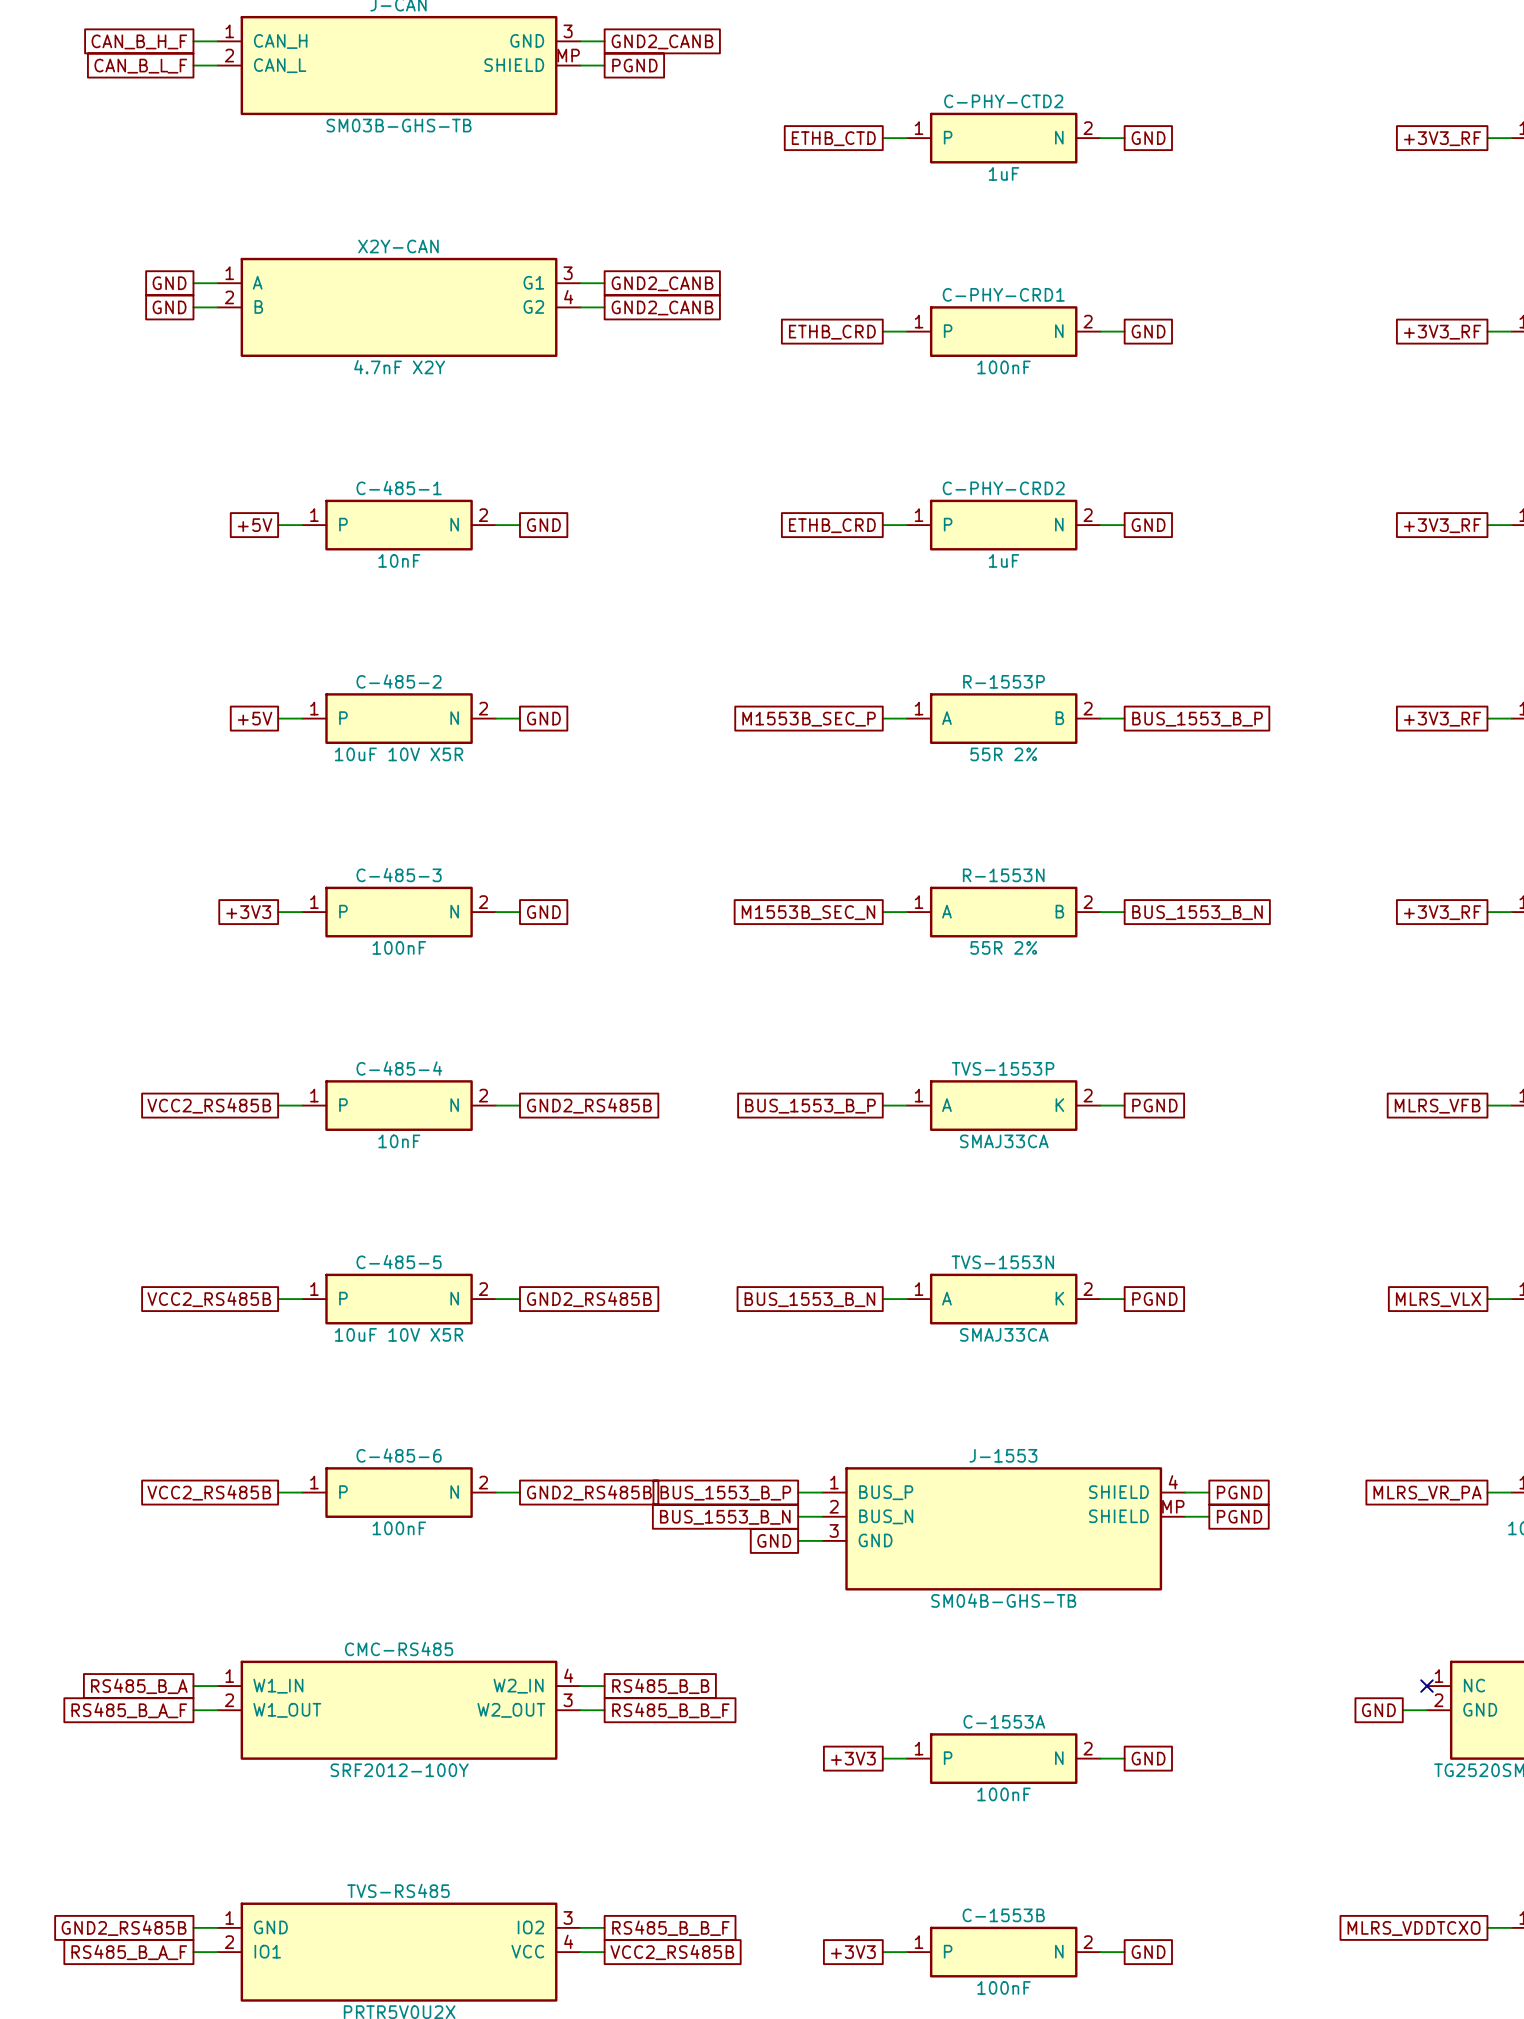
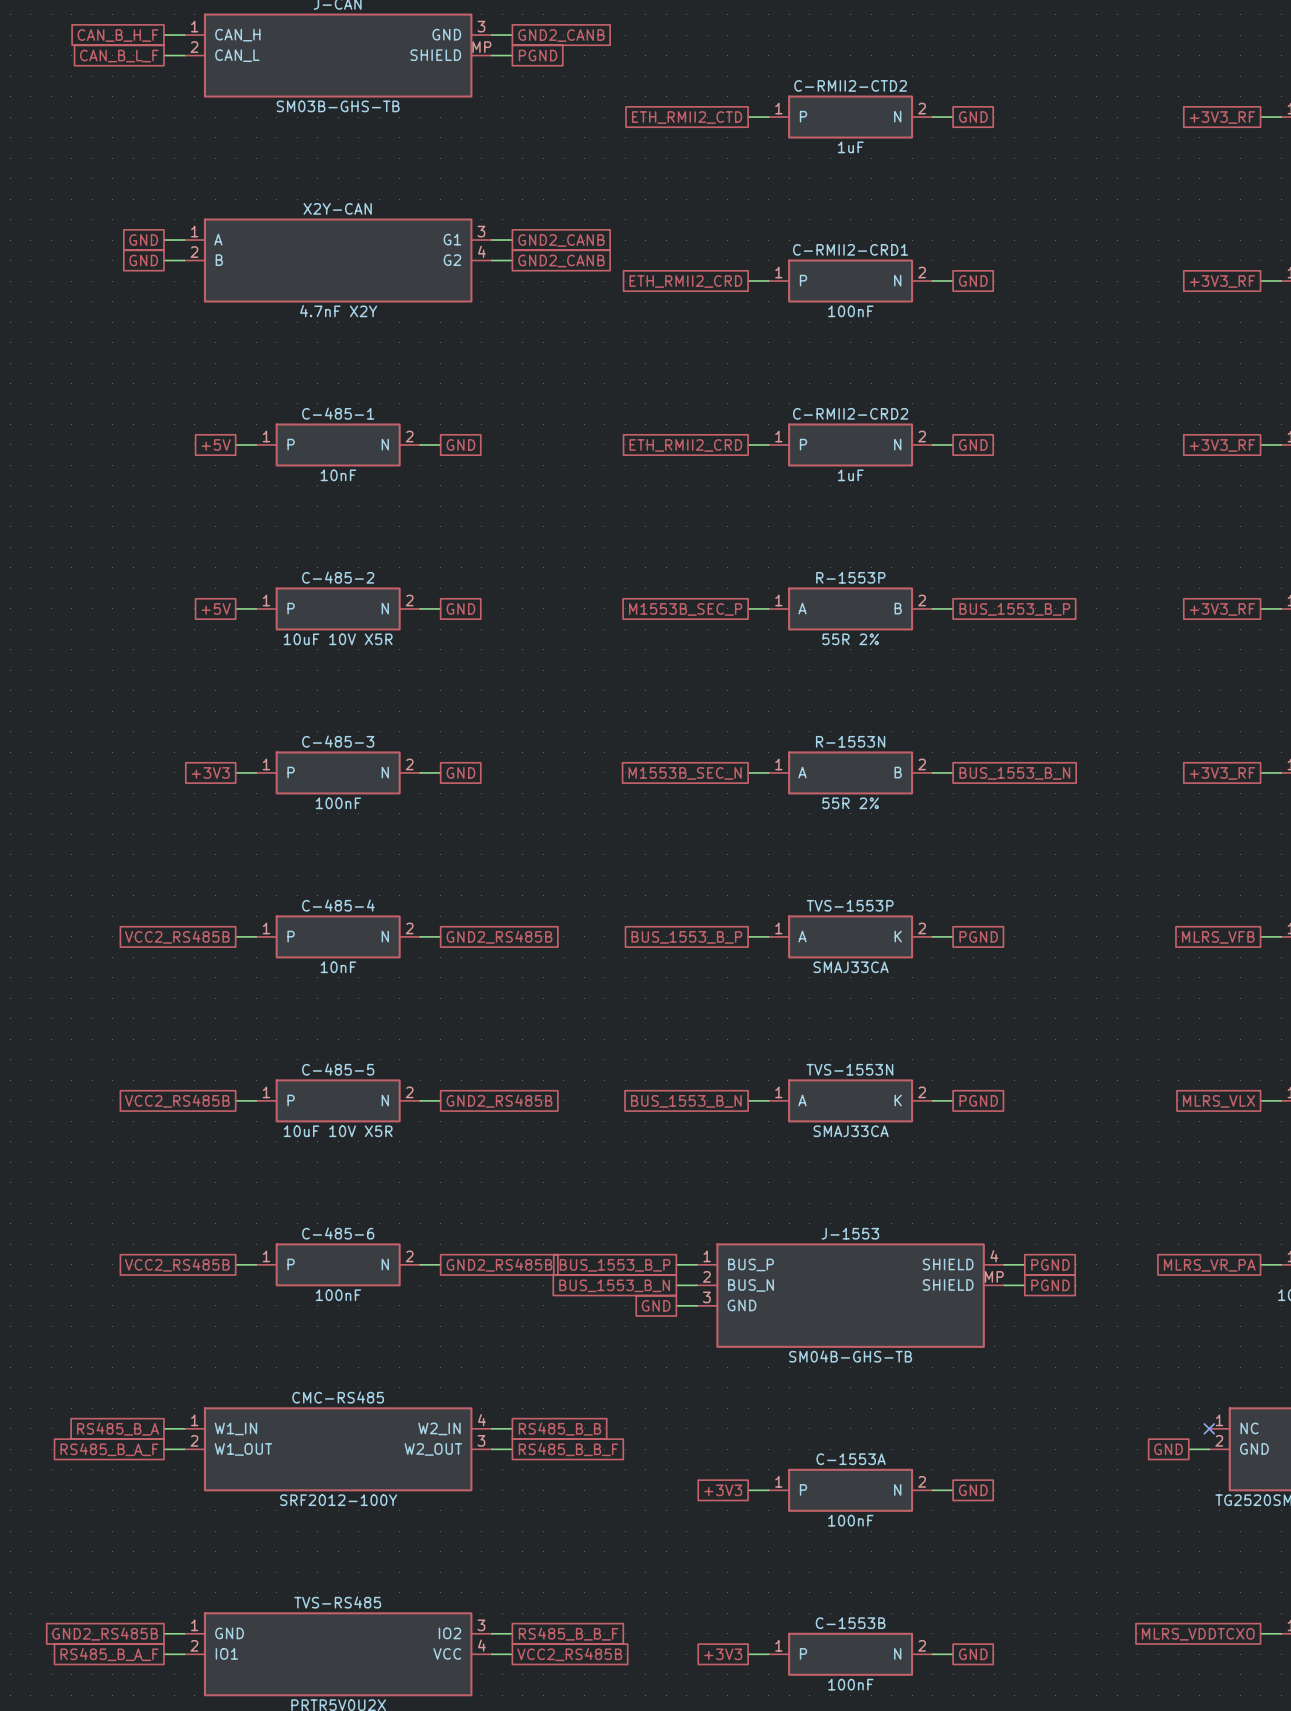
C-PHY-CTD2 name: C-PHY-CTD2 (1003, 101) -> C-RMII2-CTD2 (850, 85)
global label: ETHB_CTD (833, 138) -> ETH_RMII2_CTD (687, 117)
C-PHY-CRD1 name: C-PHY-CRD1 (1003, 294) -> C-RMII2-CRD1 (850, 249)
global label: ETHB_CRD (832, 332) -> ETH_RMII2_CRD (685, 281)
C-PHY-CRD2 name: C-PHY-CRD2 (1003, 488) -> C-RMII2-CRD2 (850, 413)
global label: ETHB_CRD (832, 525) -> ETH_RMII2_CRD (685, 445)

